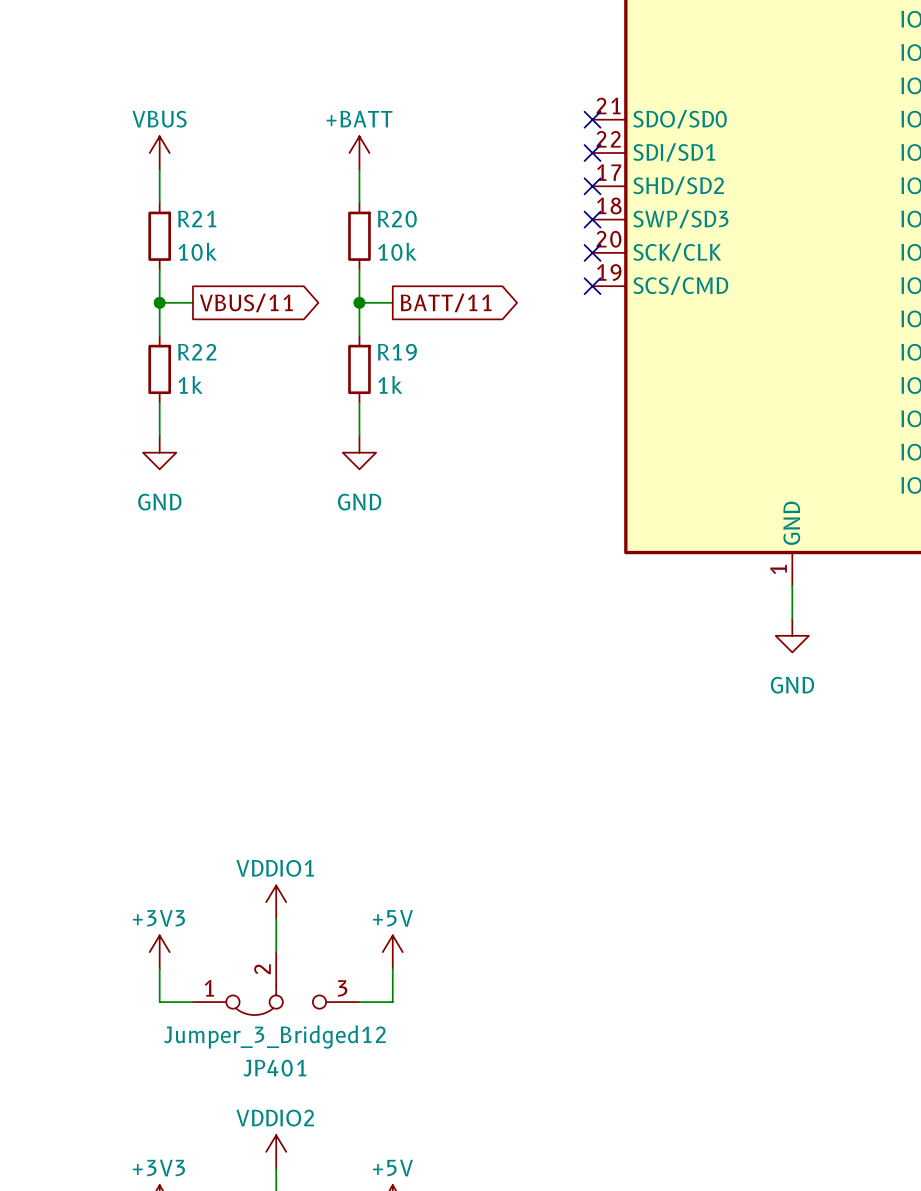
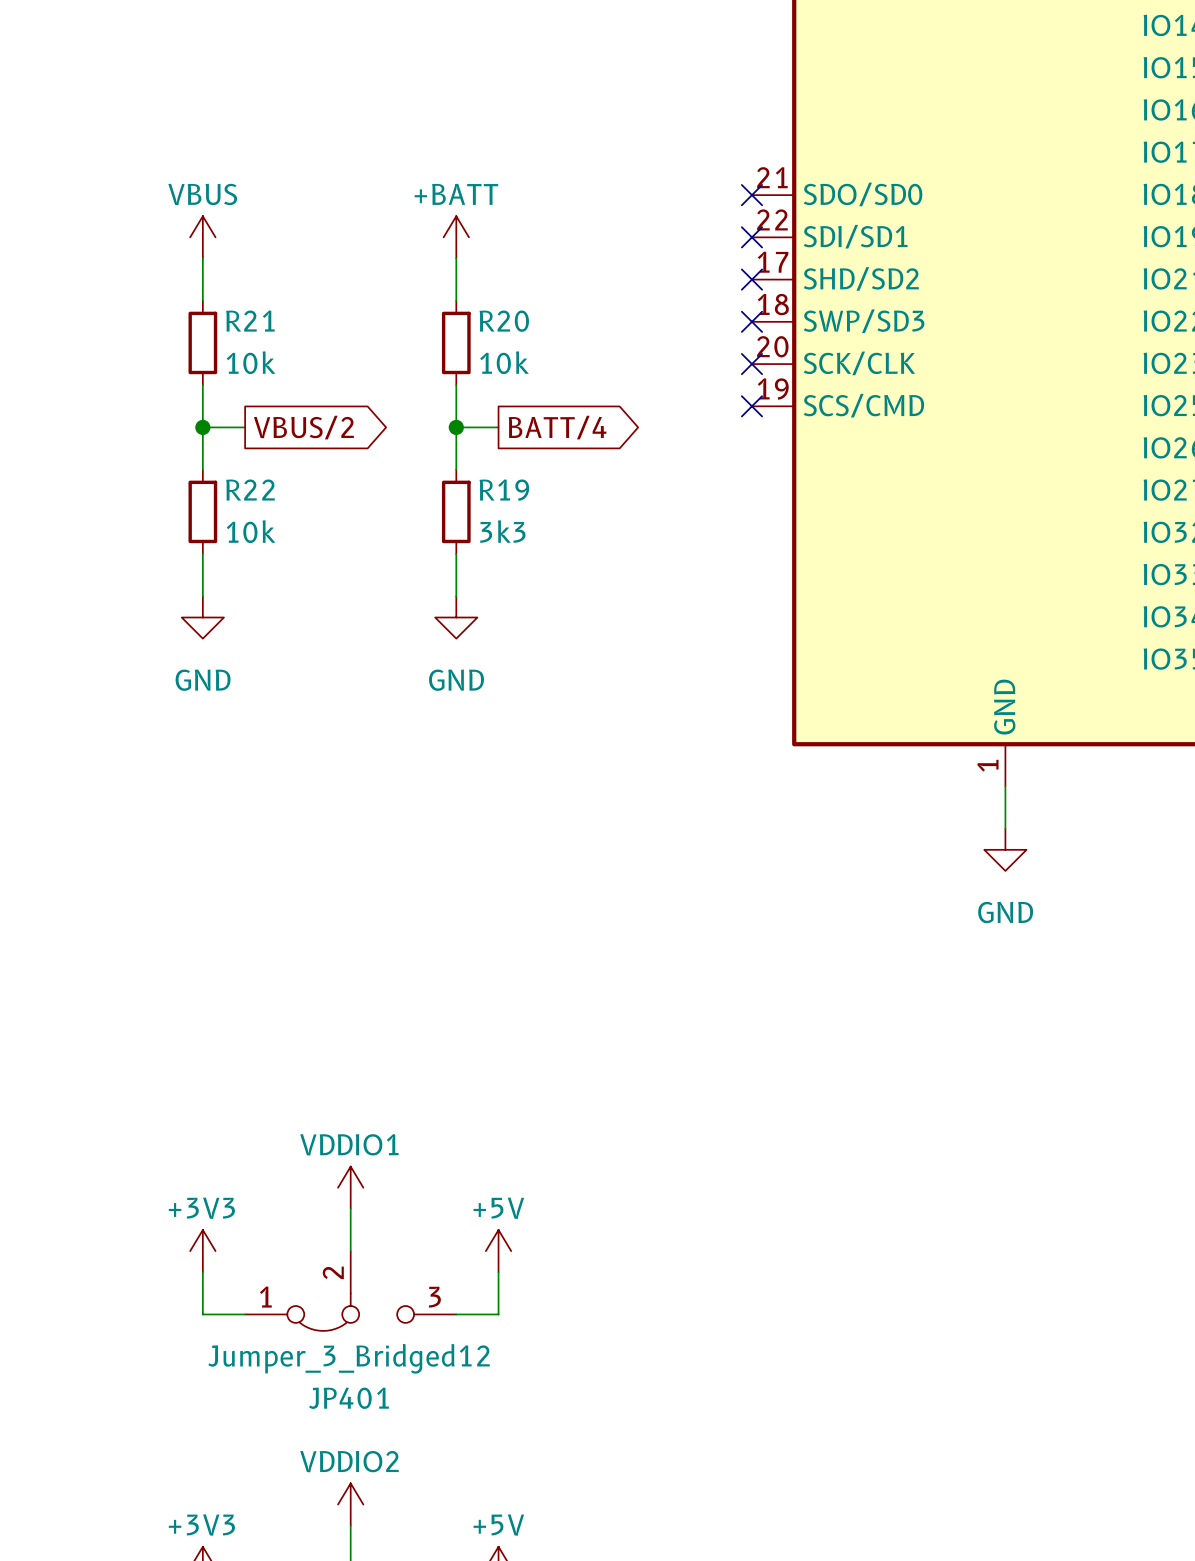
global label: VBUS/11 (246, 302) -> VBUS/2 (303, 427)
global label: BATT/11 (446, 302) -> BATT/4 (557, 427)
R22 value: 1k (190, 384) -> 10k (251, 531)
R19 value: 1k (390, 384) -> 3k3 (502, 531)

